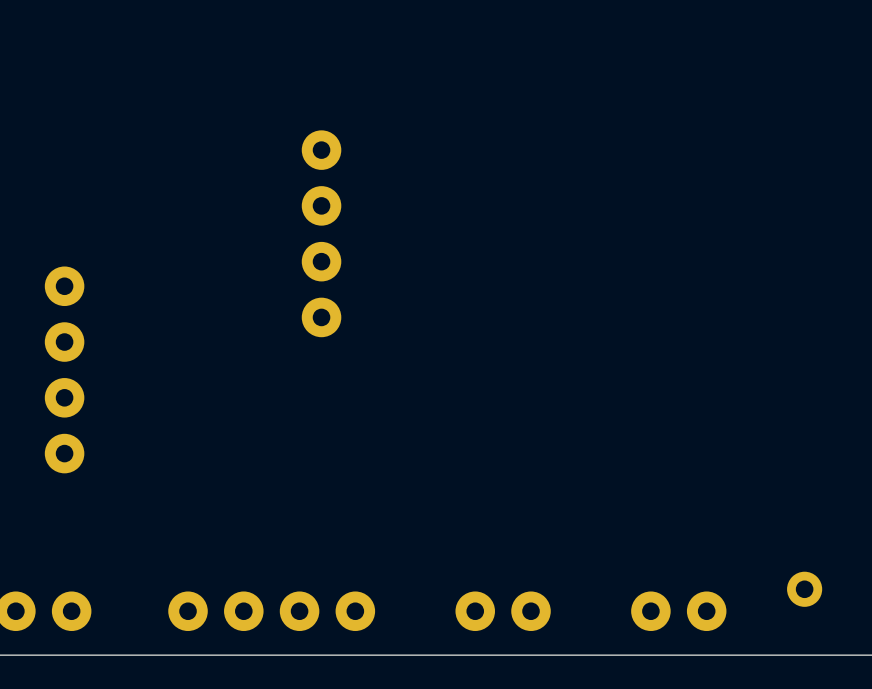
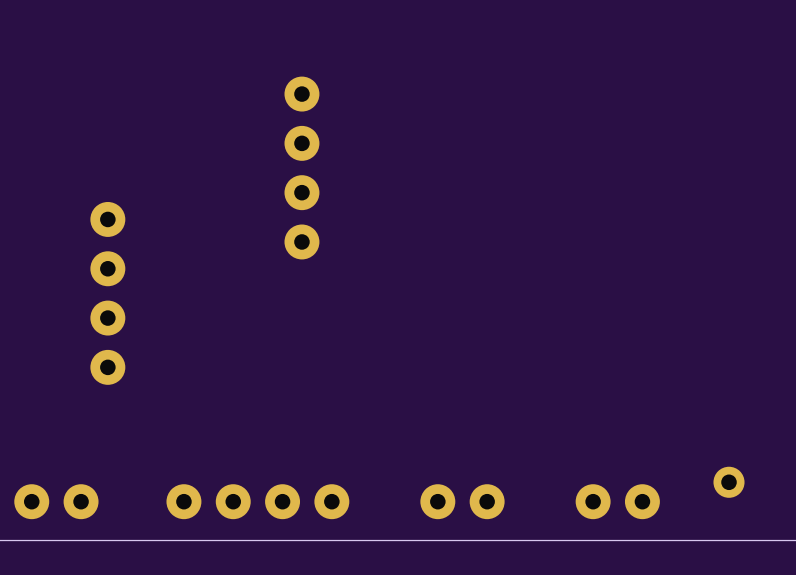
part position: (64, 369) -> (107, 293)

